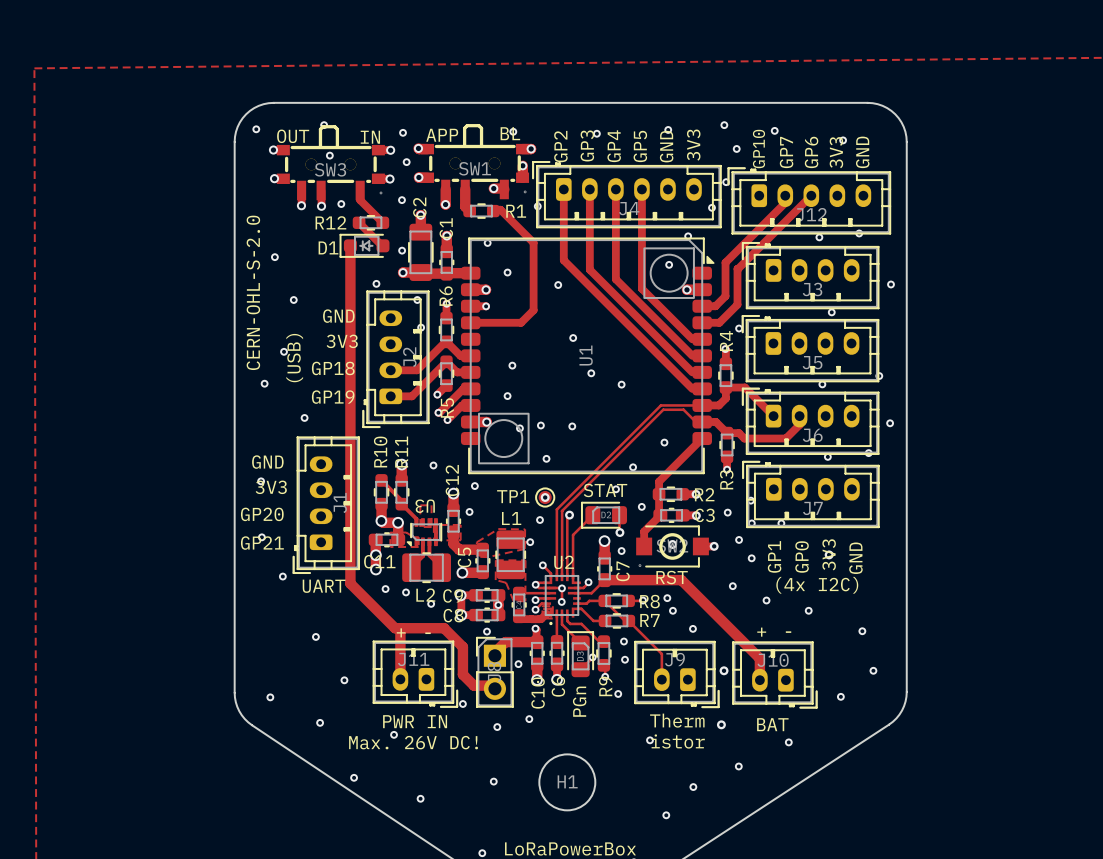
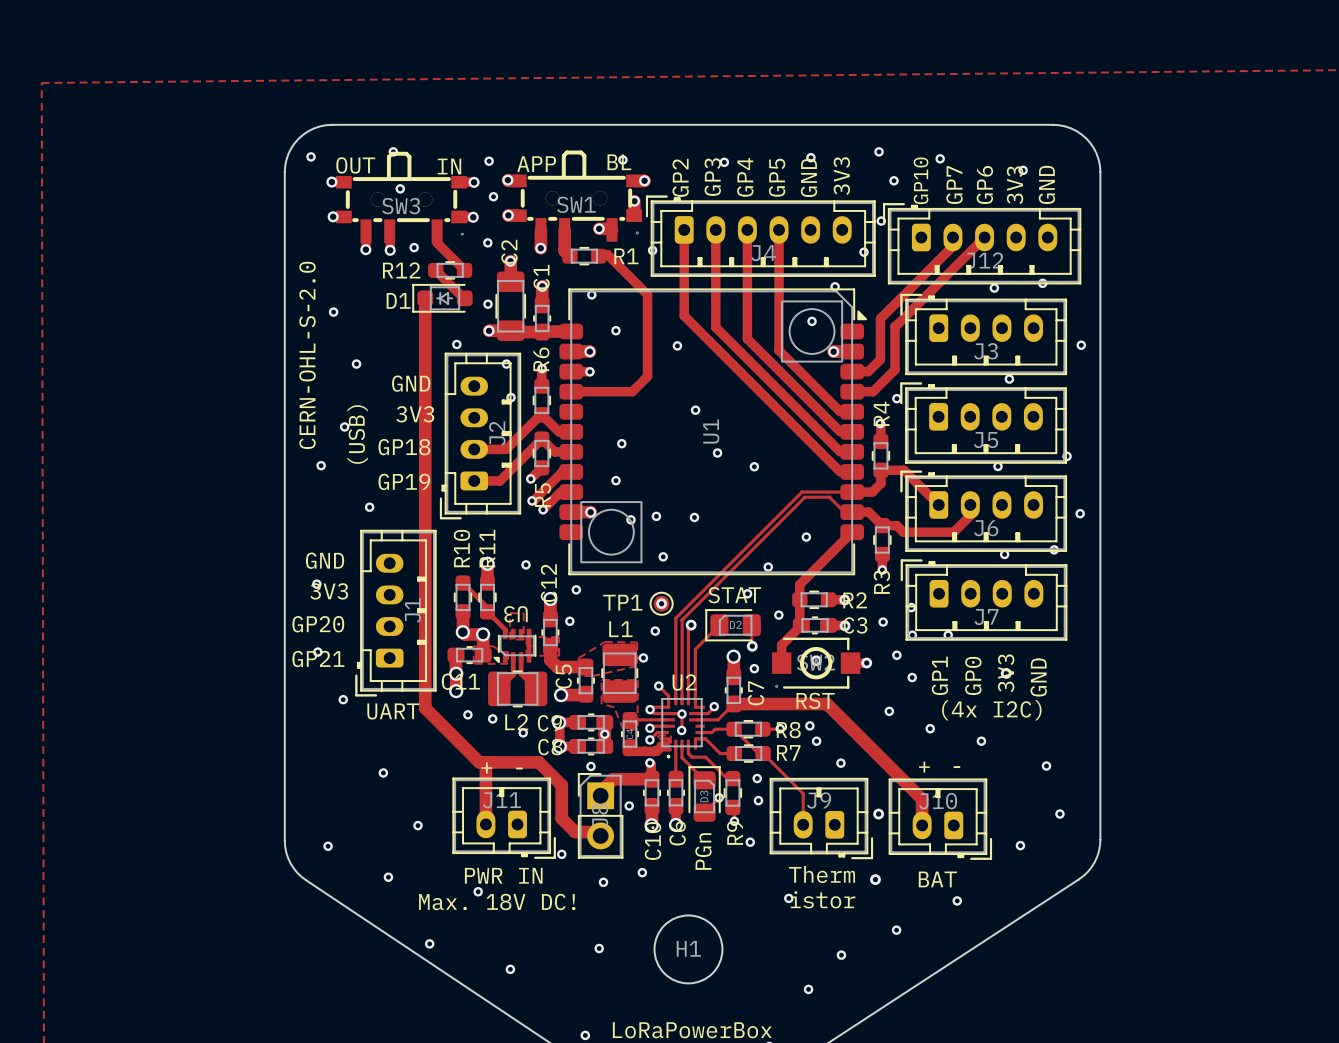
text: Max. 26V DC! (413, 742) -> Max. 18V DC! (497, 902)

